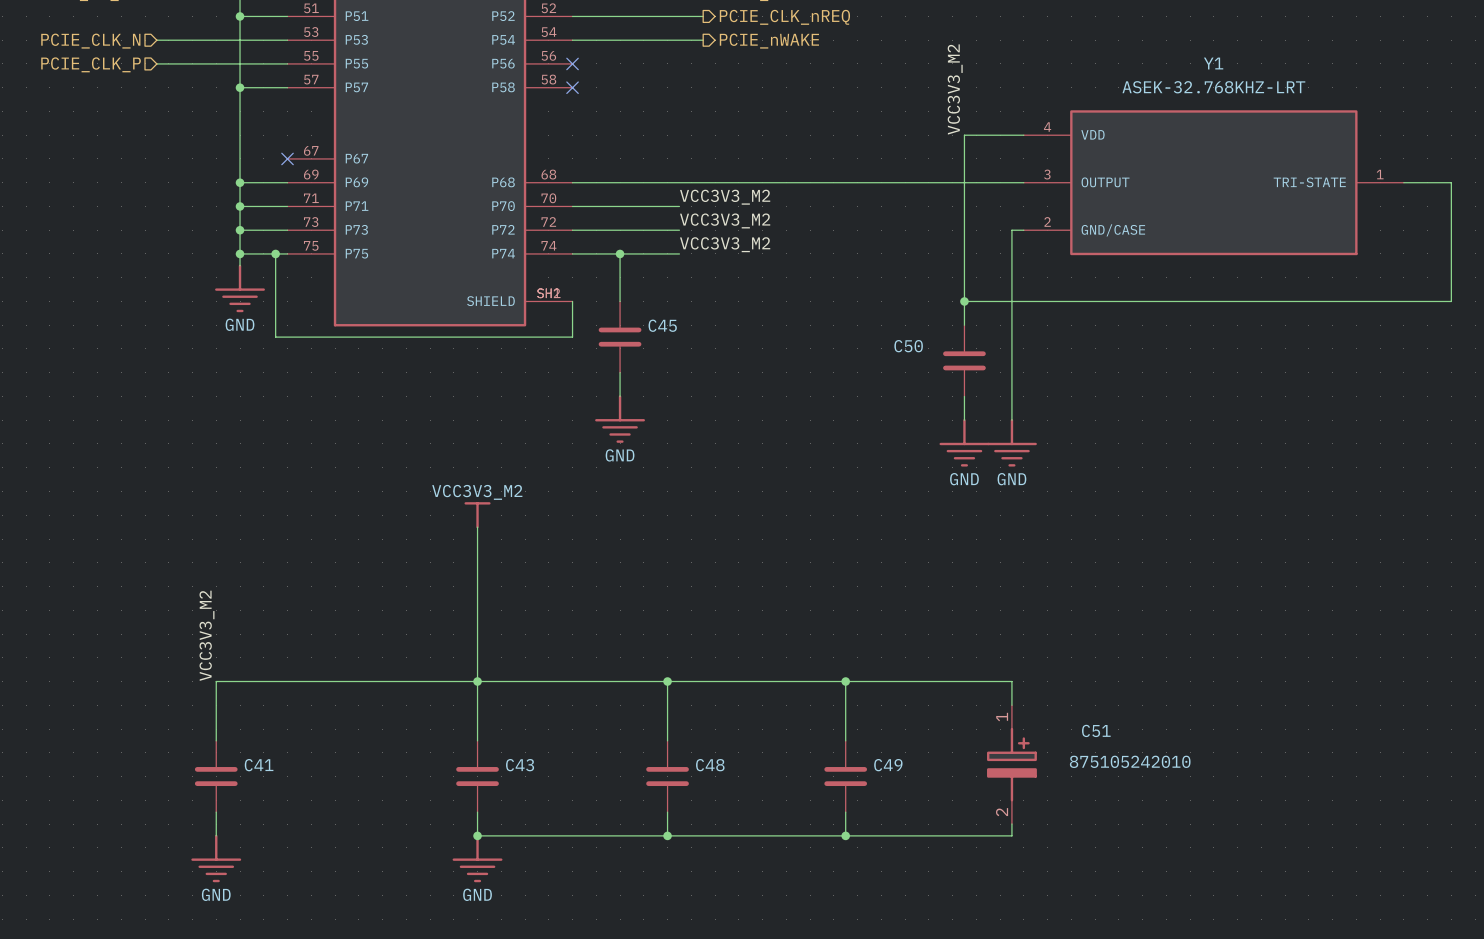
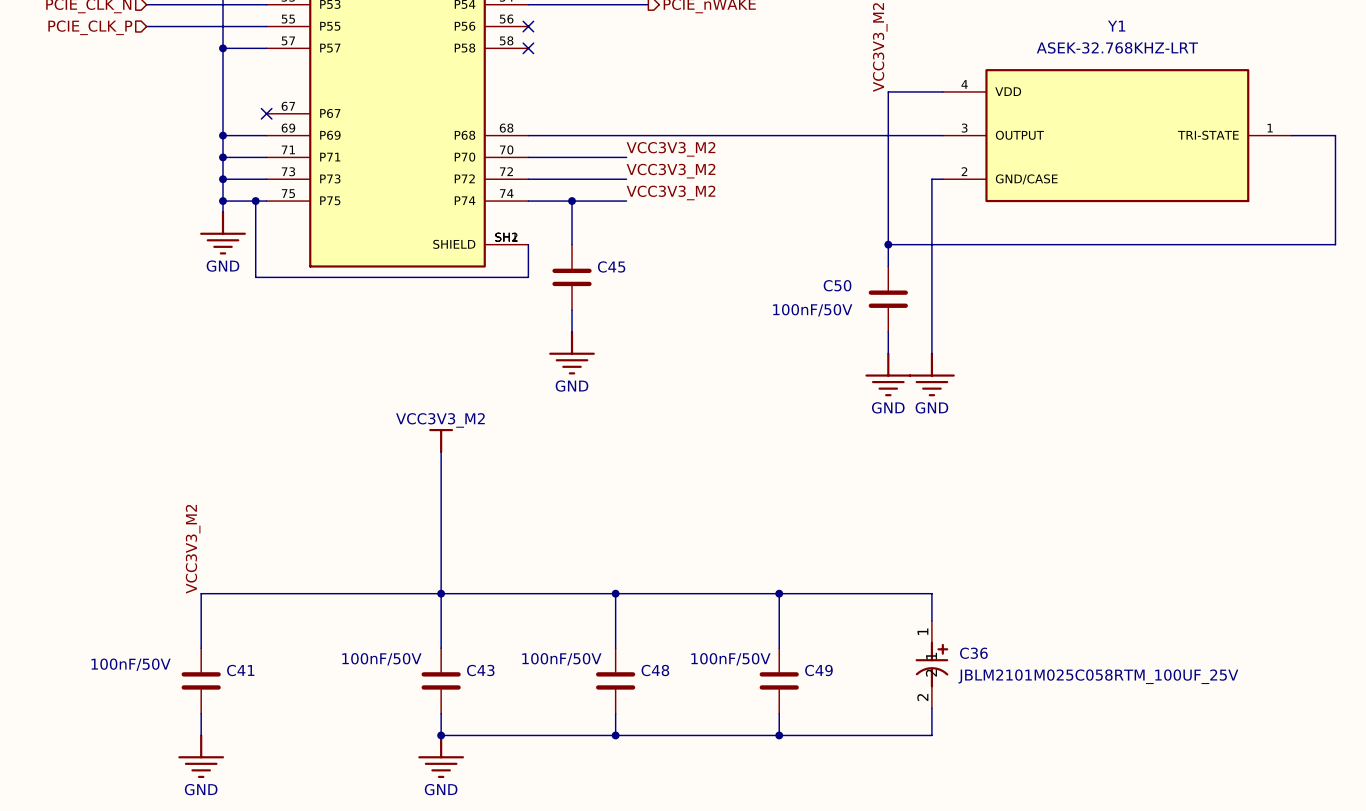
C50 value: none -> 100nF/50V (812, 310)
C43 value: none -> 100nF/50V (381, 659)
C48 value: none -> 100nF/50V (561, 659)
C49 value: none -> 100nF/50V (730, 659)
C41 value: none -> 100nF/50V (131, 664)
C36: none -> JBLM2101M025C058RTM_100UF_25V (931, 664)
C51: 875105242010 (1011, 764) -> none

